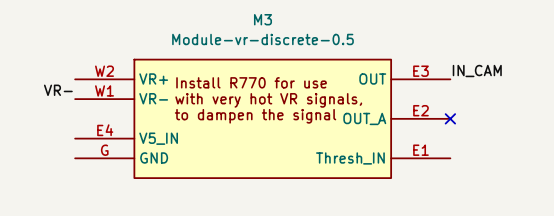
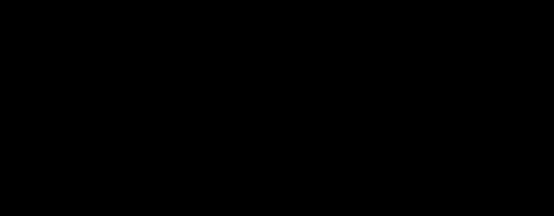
label: IN_CAM (477, 71) -> none
label: VR- (58, 90) -> none
M3: Module-vr-discrete-0.5 (262, 118) -> none
no-connect mark: (450, 118) -> none

